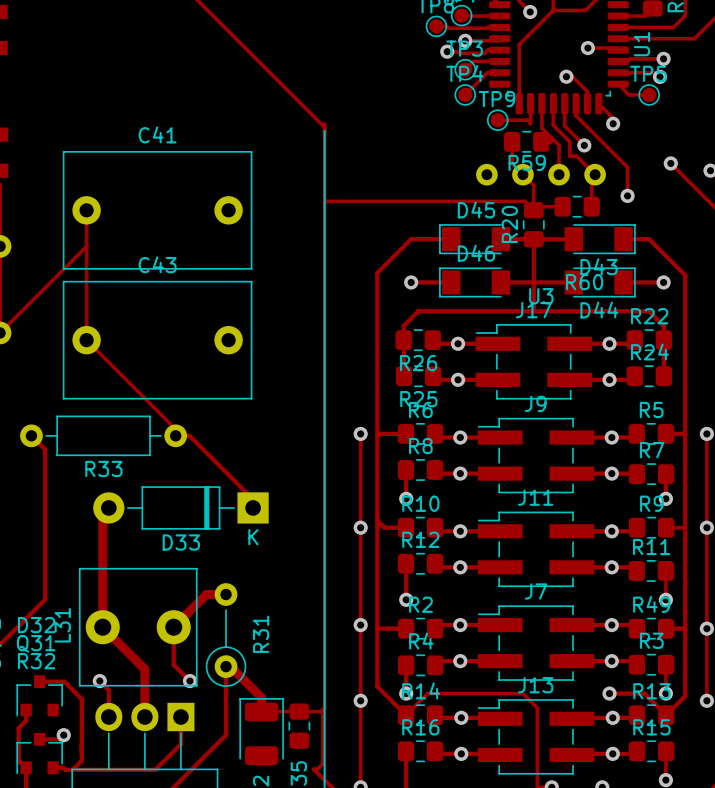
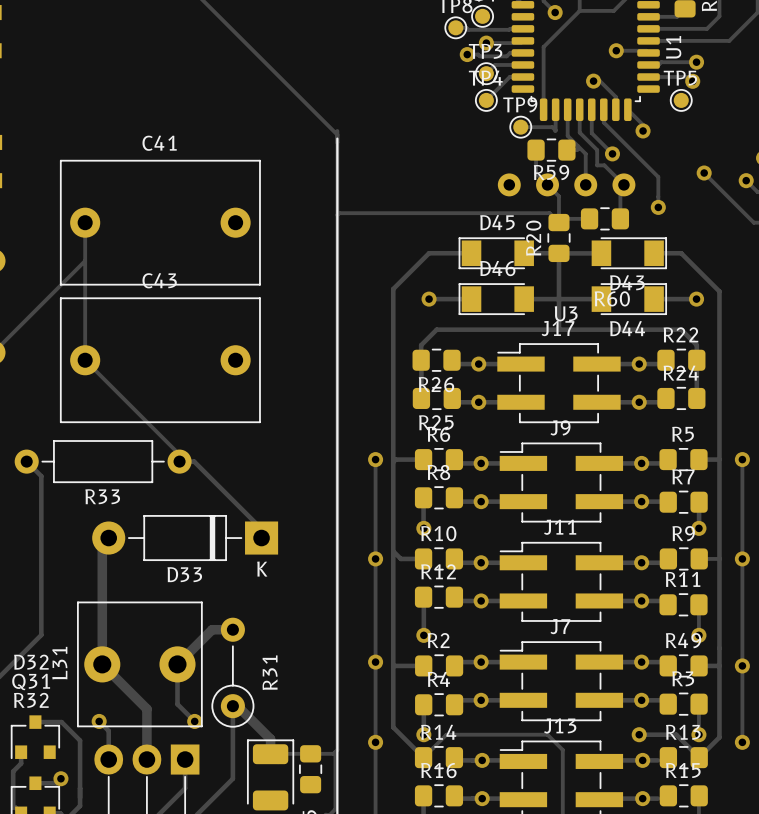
track: (461, 15) (499, 16) -> none
track: (618, 84) (629, 94) (649, 94) -> none

